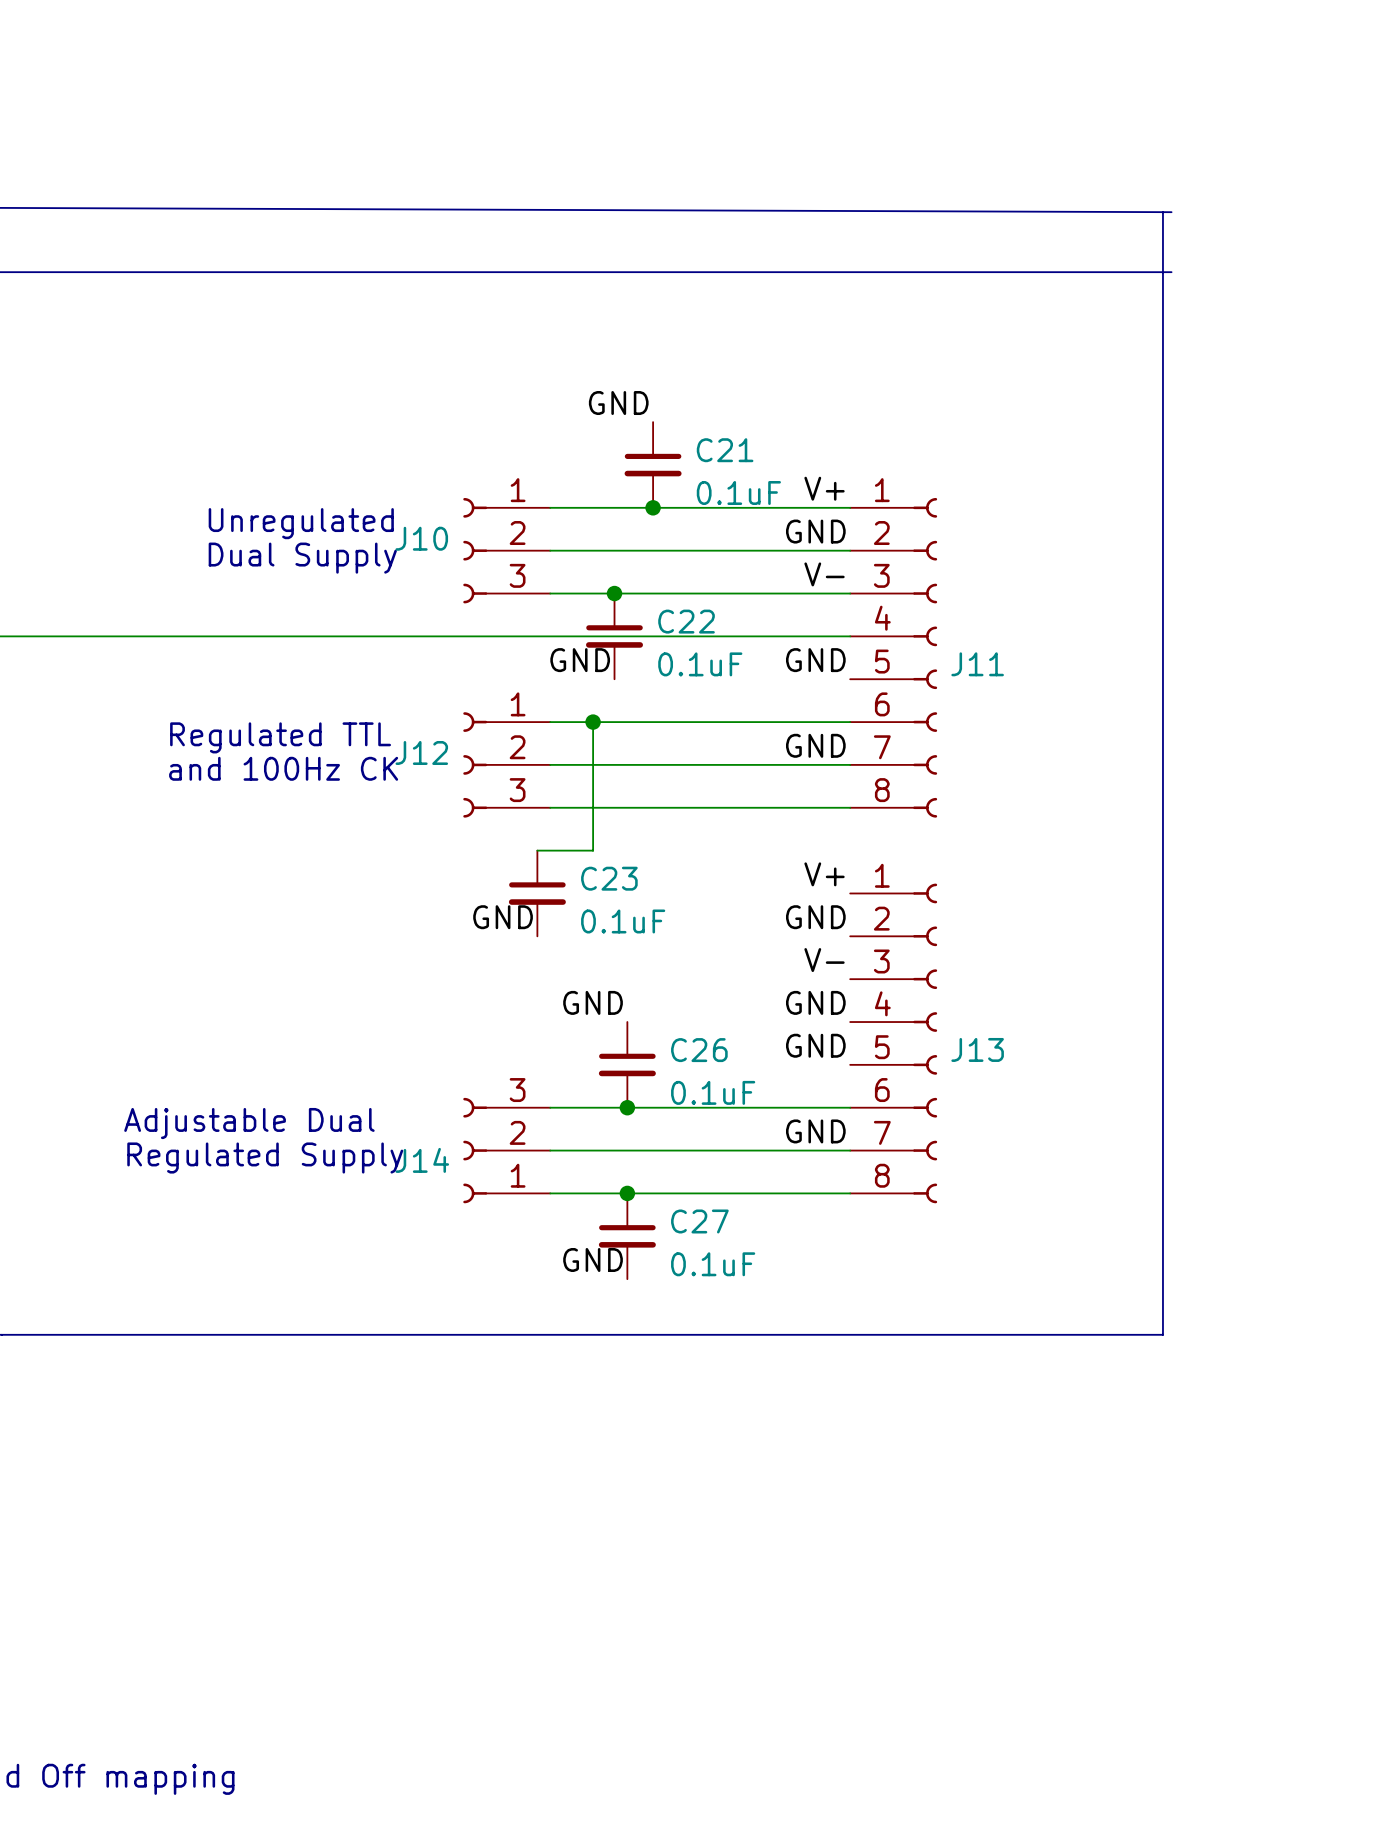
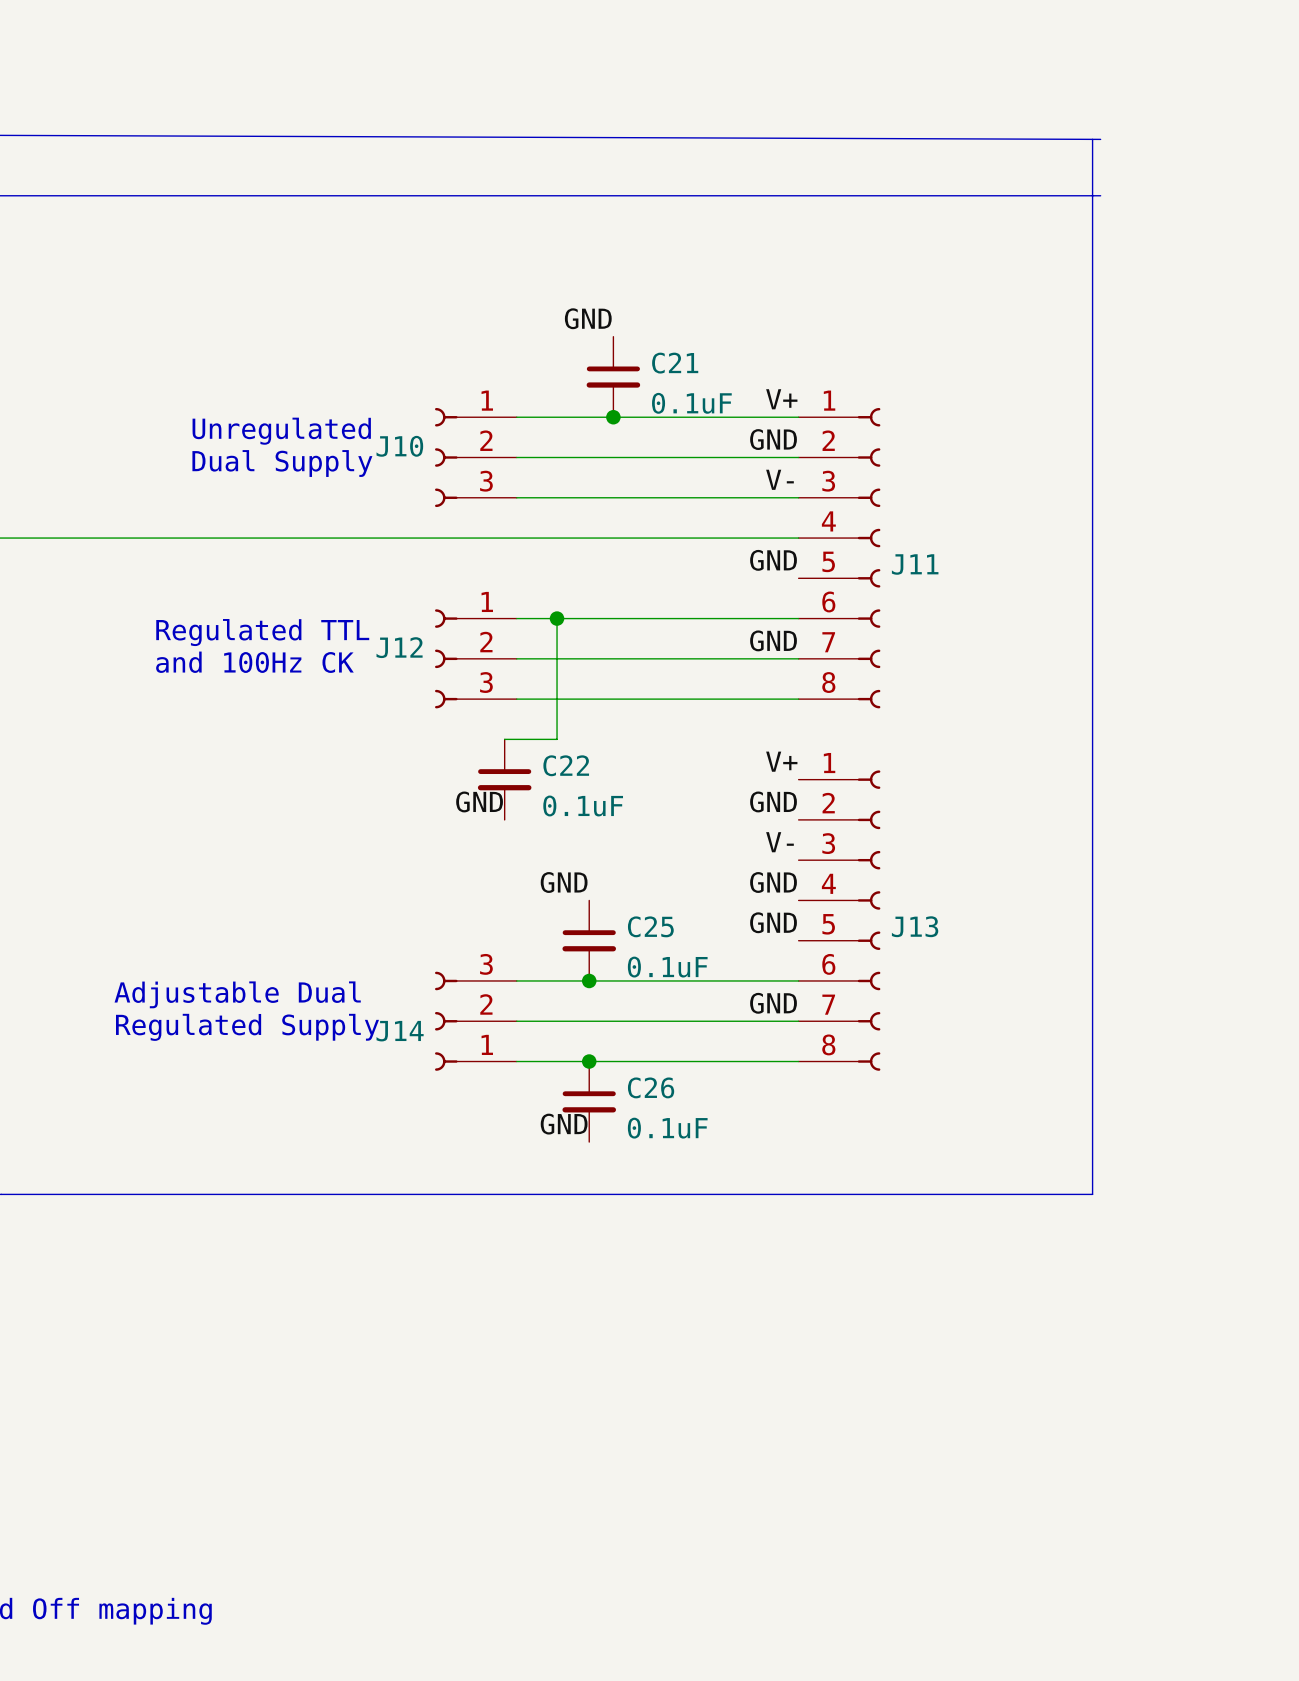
junction: (614, 593) -> none
C22: 0.1uF (614, 636) -> none
label: GND (580, 660) -> none
C23 name: C23 (609, 878) -> C22 (566, 765)
C26 name: C26 (699, 1050) -> C25 (650, 926)
C27 name: C27 (699, 1221) -> C26 (651, 1087)

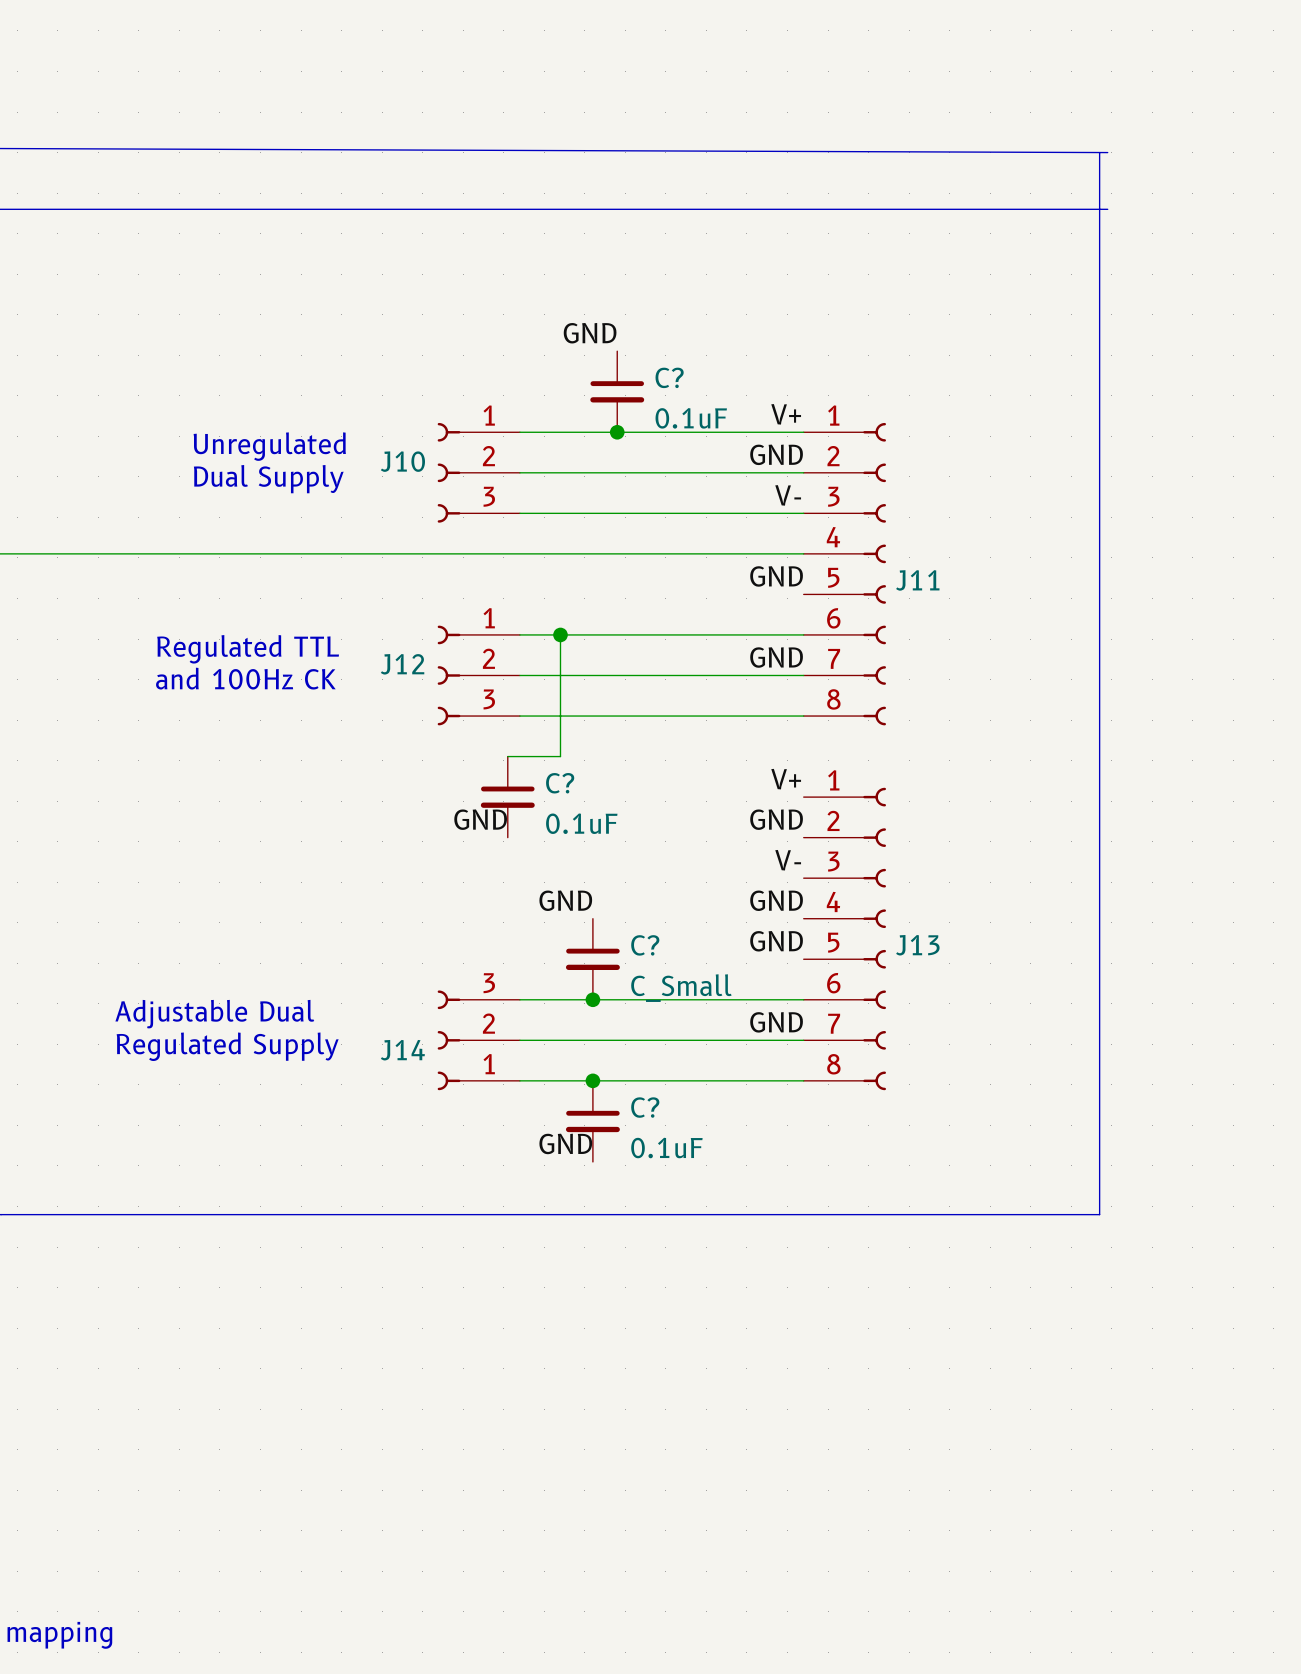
C21 name: C21 (675, 363) -> C? (669, 377)
C22 name: C22 (566, 765) -> C? (560, 783)
C25 name: C25 (650, 926) -> C? (645, 945)
C25 value: 0.1uF (667, 967) -> C_Small (681, 988)
C26 name: C26 (651, 1087) -> C? (645, 1107)

